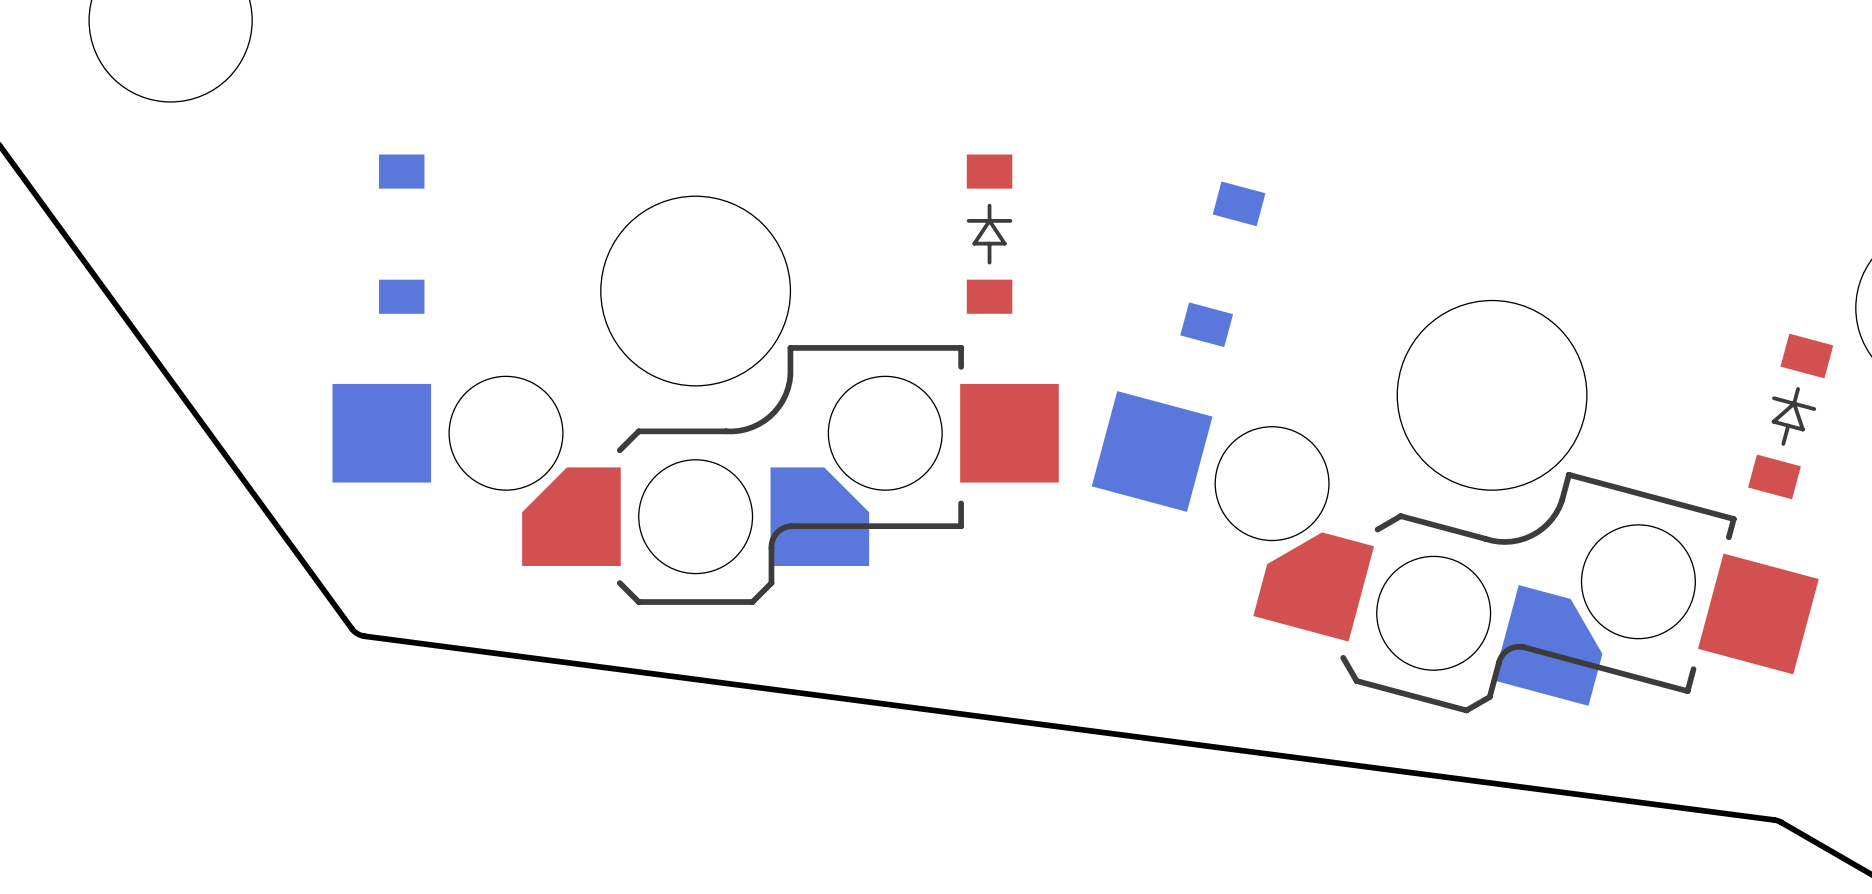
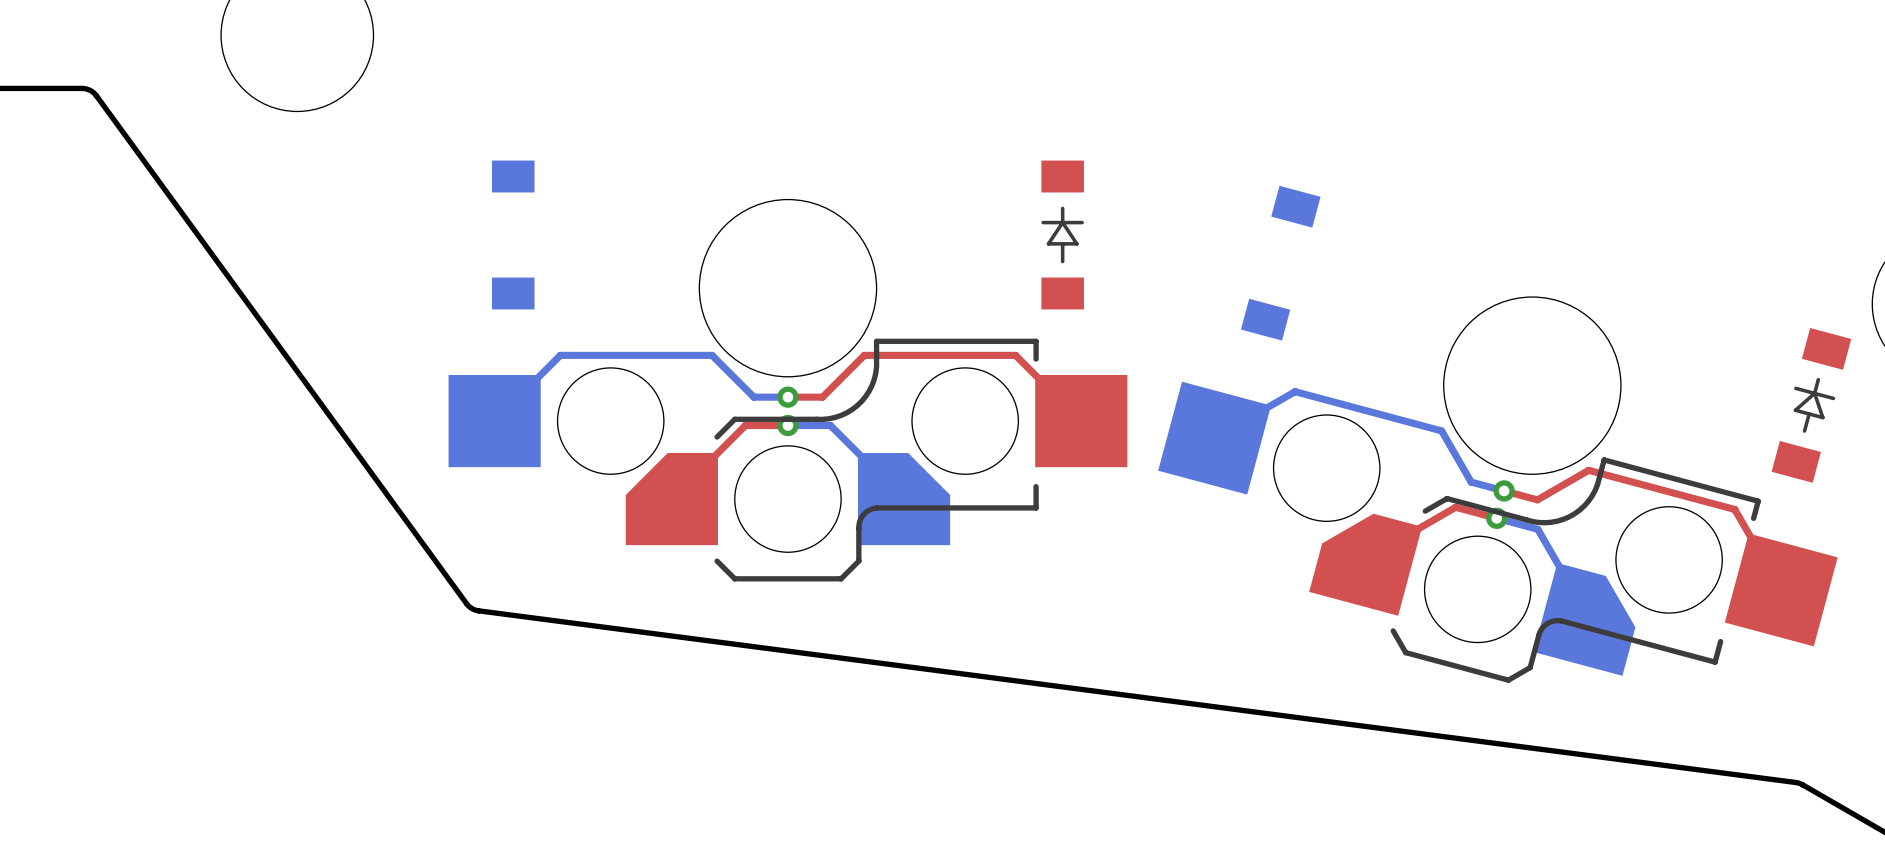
top track: none -> (787, 397) (822, 397) (864, 355) (1015, 355) (1081, 421)
bottom track: none -> (787, 397) (753, 397) (712, 355) (560, 355) (494, 421)
via: none -> (787, 397)
top track: none -> (787, 425) (745, 425) (671, 499)
bottom track: none -> (787, 425) (830, 425) (904, 499)
via: none -> (787, 425)
bottom track: none -> (1214, 438) (1295, 391) (1441, 430) (1471, 482) (1504, 490)
top track: none -> (1504, 490) (1537, 499) (1588, 470) (1734, 509) (1781, 589)
via: none -> (1504, 490)
top track: none -> (1496, 518) (1455, 507) (1365, 559)
bottom track: none -> (1496, 518) (1537, 529) (1589, 619)
via: none -> (1496, 518)

